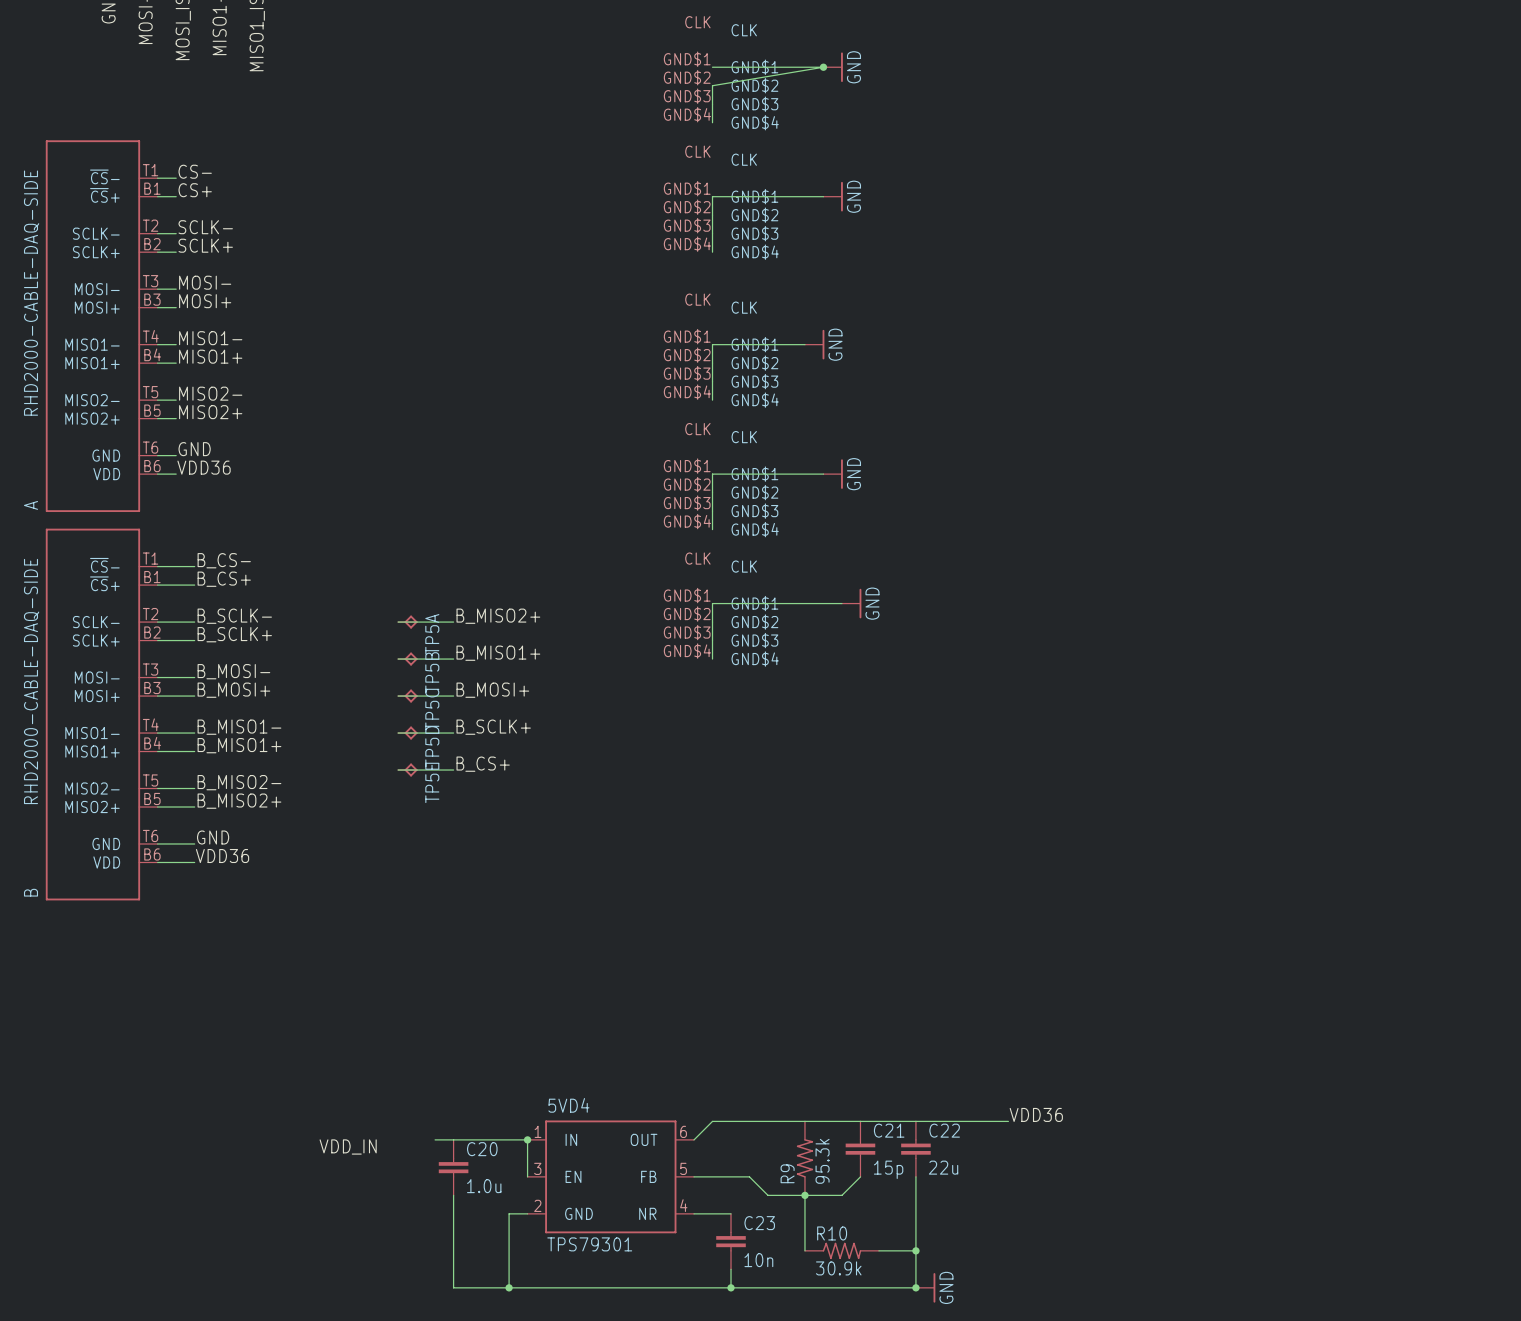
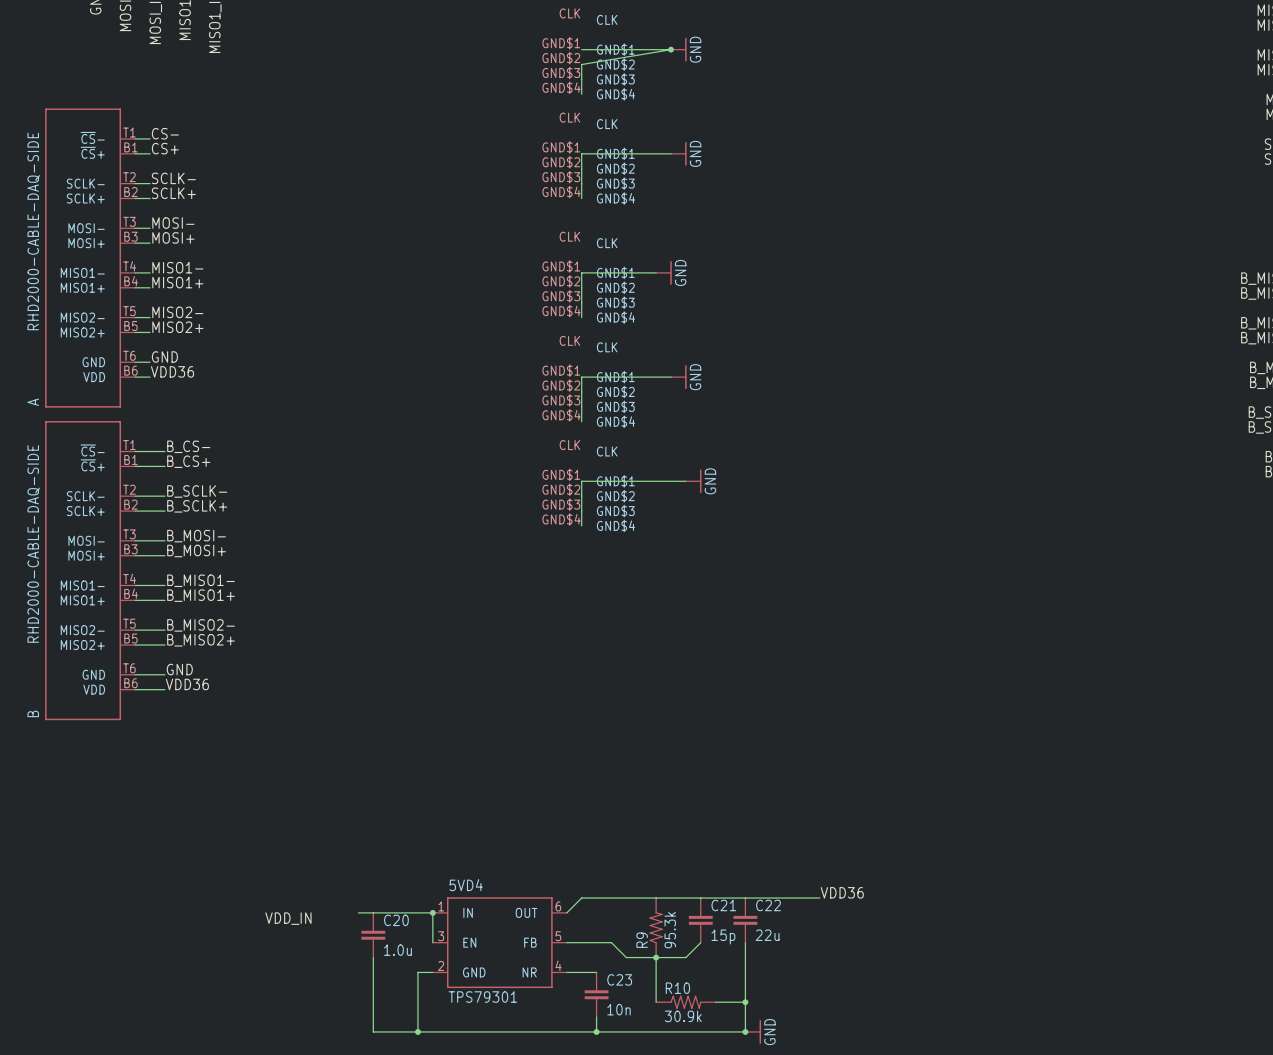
label: B_MISO2+ (498, 616) -> none
wire: (398, 622) (453, 622) -> none
TP5A: (407, 622) -> none
label: B_MISO1+ (498, 653) -> none
wire: (398, 659) (453, 659) -> none
TP5B: (407, 659) -> none
label: B_MOSI+ (492, 690) -> none
wire: (398, 696) (453, 696) -> none
TP5C: (407, 696) -> none
label: B_SCLK+ (493, 727) -> none
wire: (398, 733) (453, 733) -> none
TP5D: (407, 733) -> none
label: B_CS+ (483, 764) -> none
wire: (398, 770) (453, 770) -> none
TP5E: (407, 770) -> none

